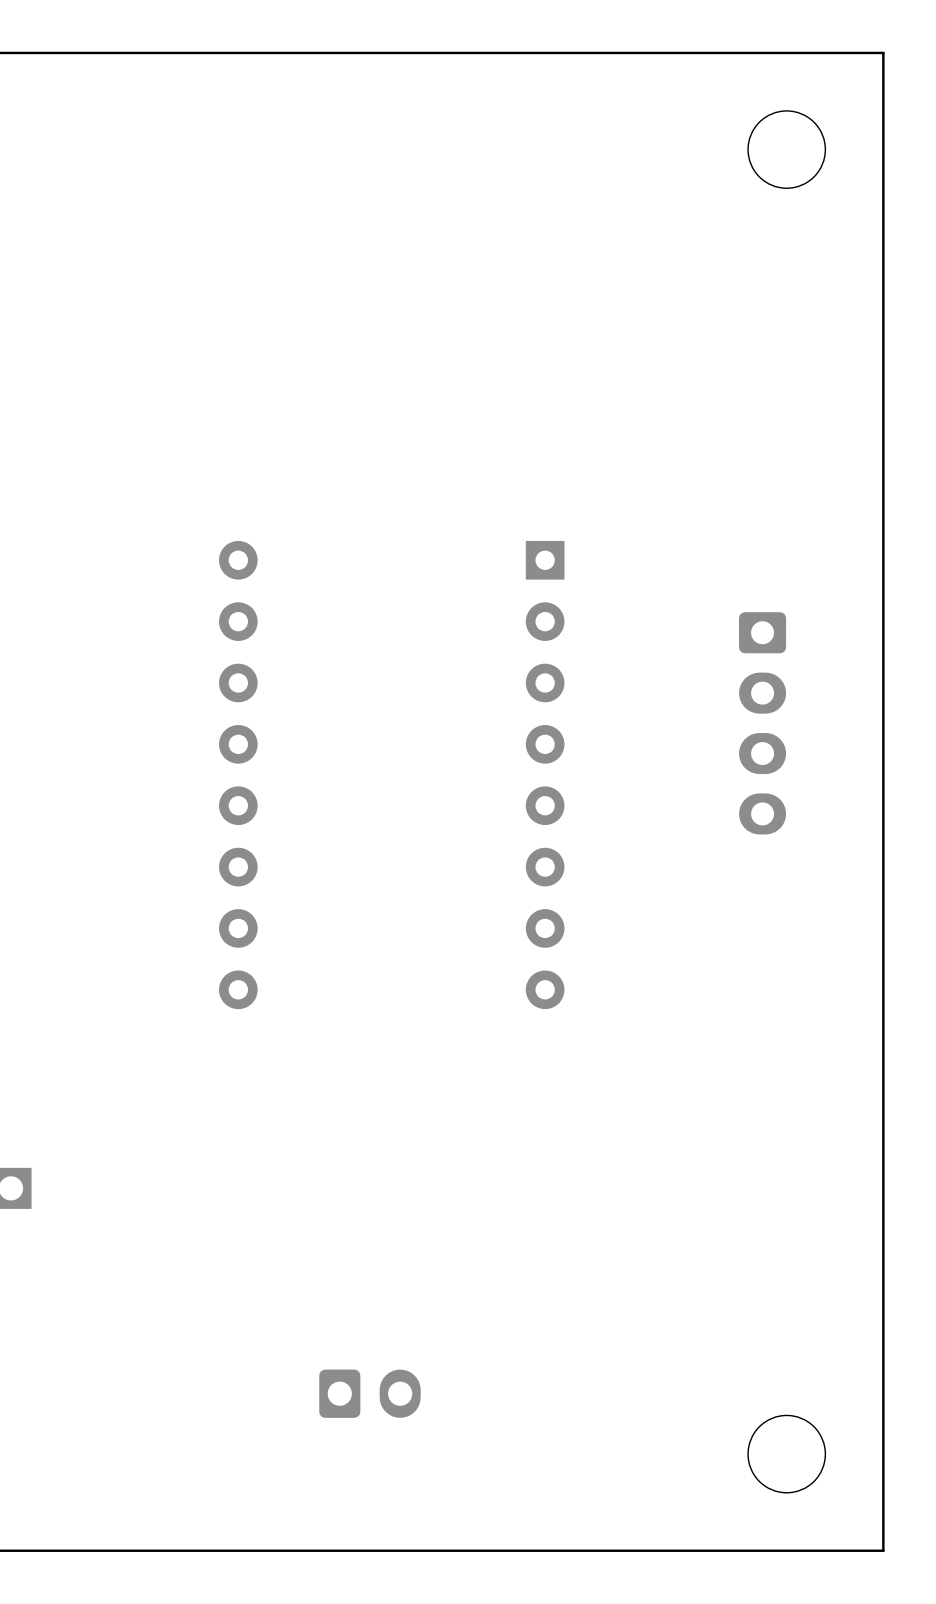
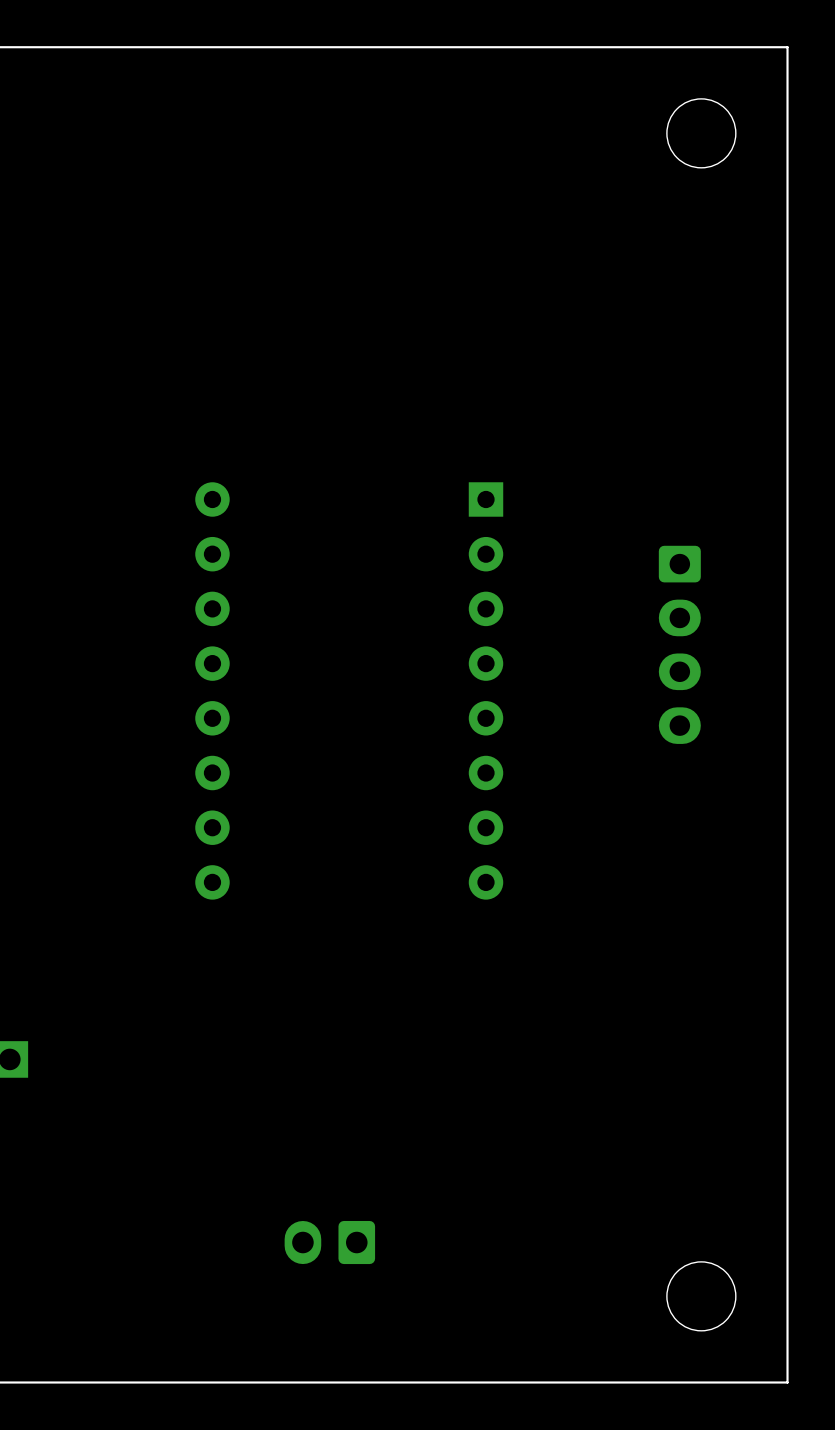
part rotation: 0° (369, 1393) -> 180° (329, 1242)

